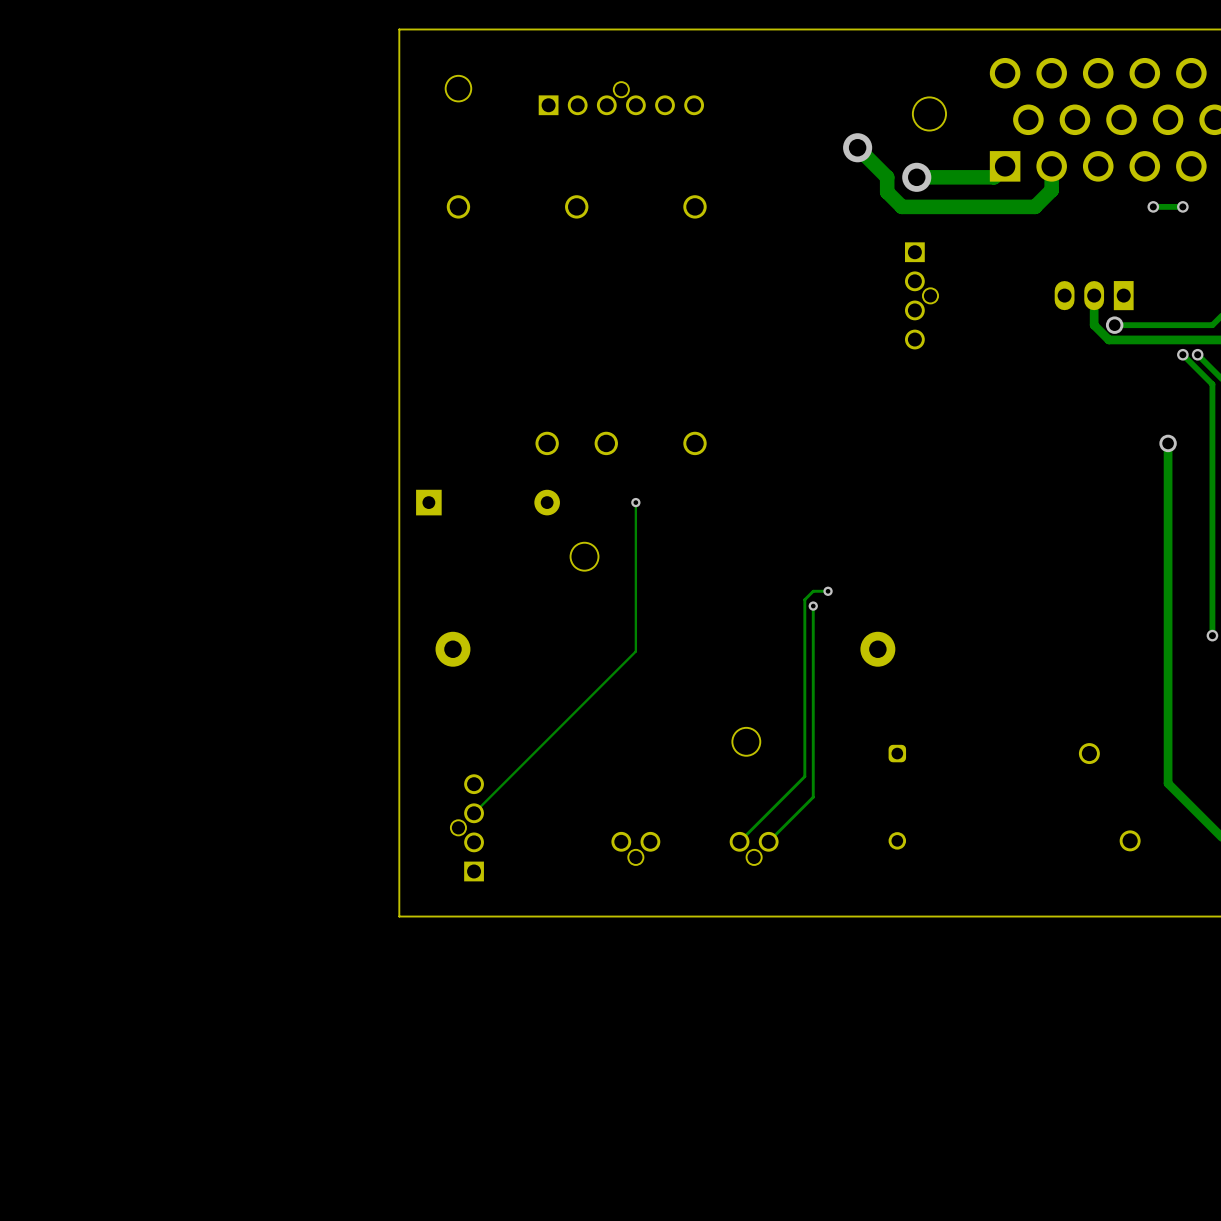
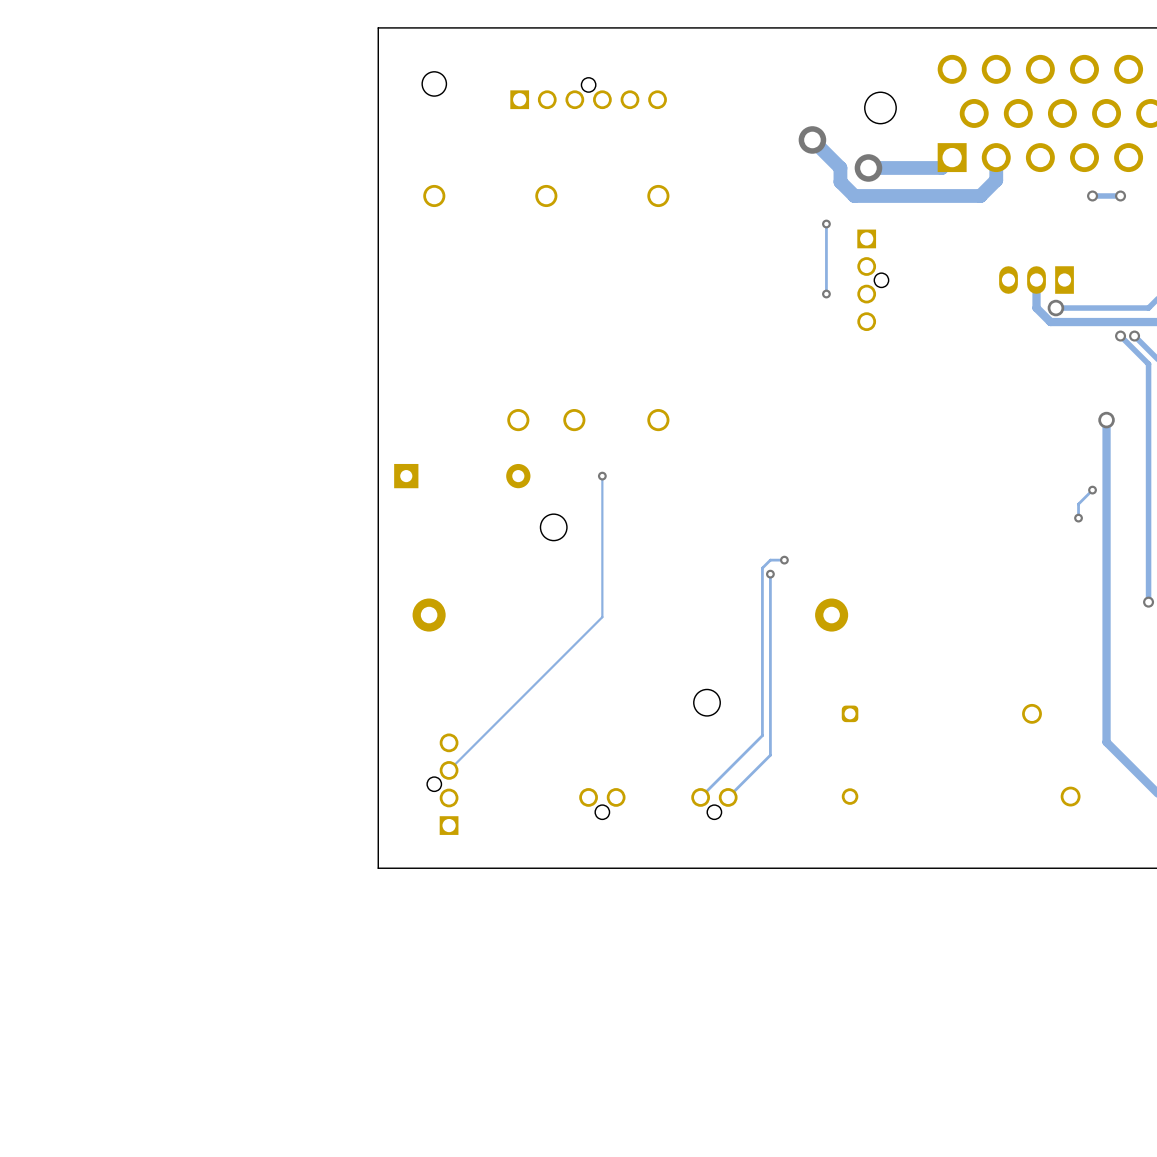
track: none -> (826, 224) (826, 294)
via: none -> (826, 224)
via: none -> (826, 294)
track: none -> (1092, 490) (1078, 504) (1078, 518)
via: none -> (1092, 490)
via: none -> (1078, 518)

